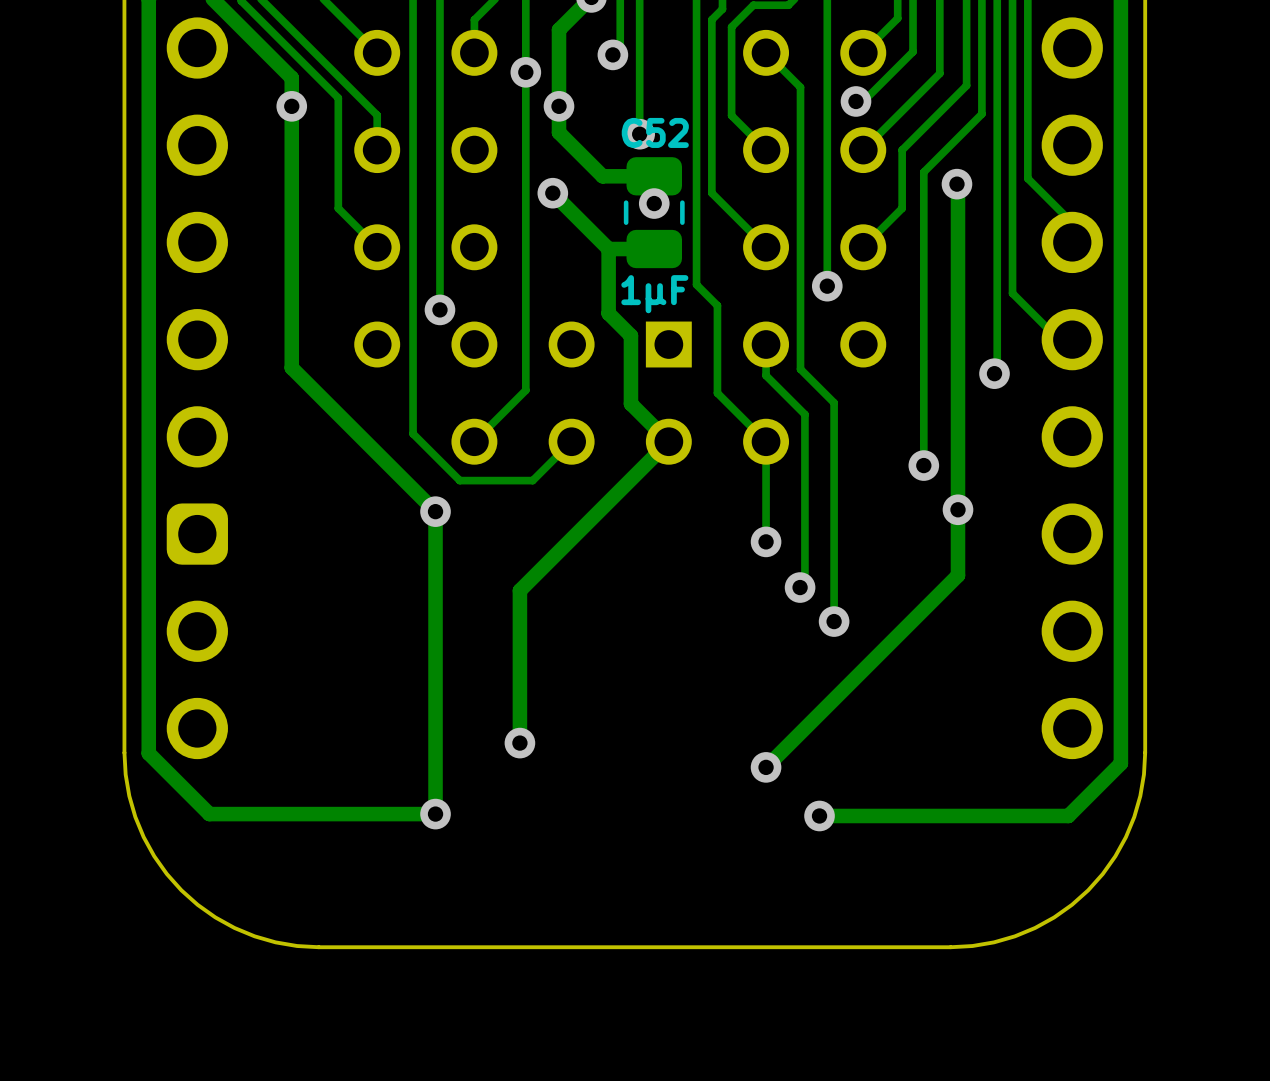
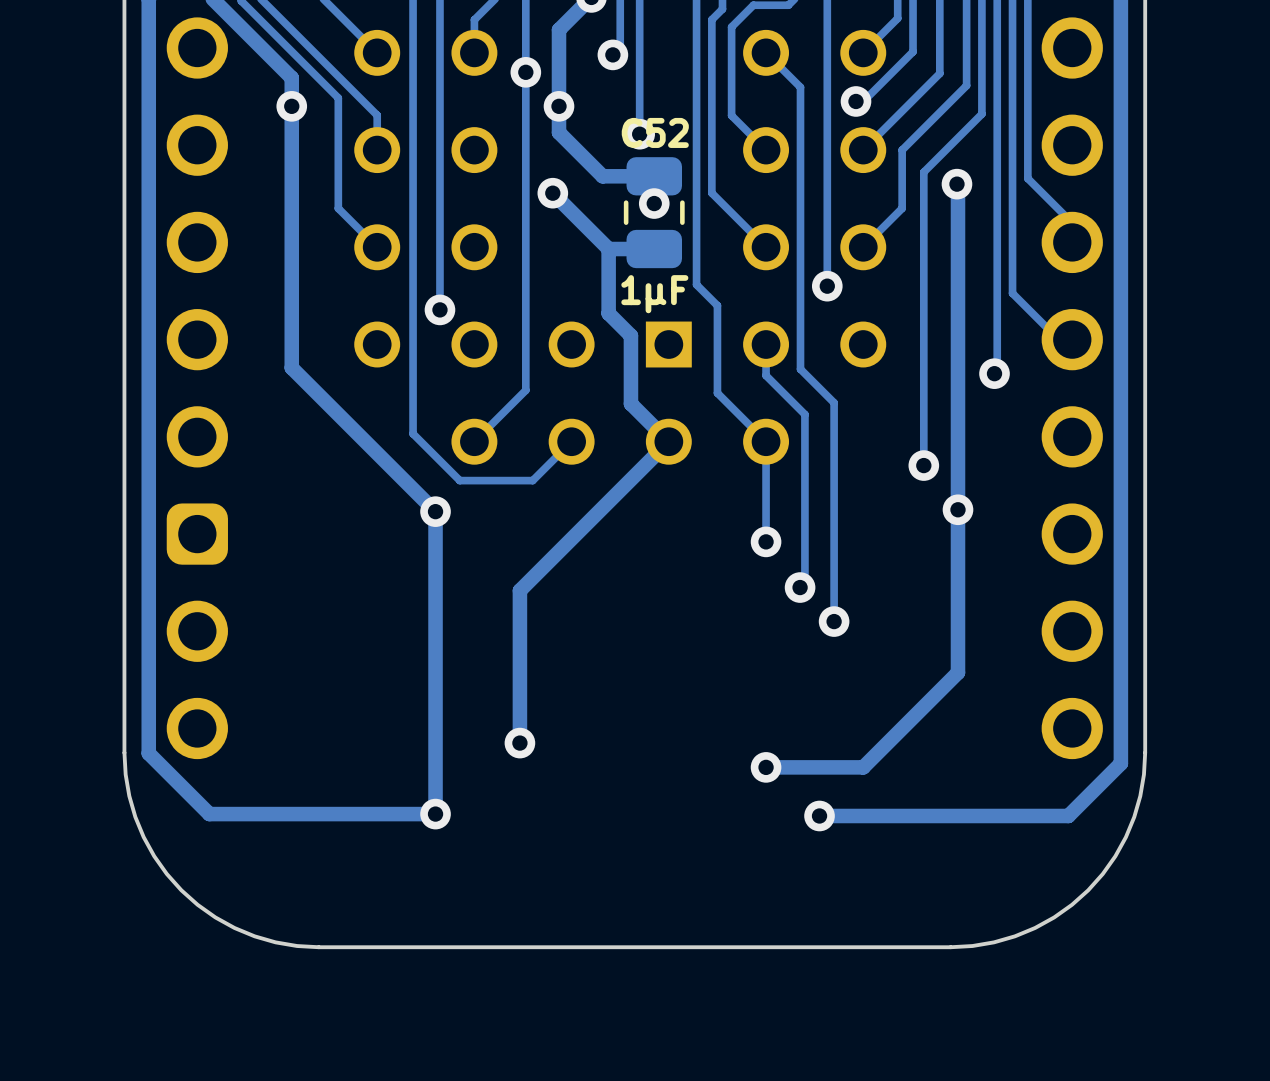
track: (957, 575) (766, 767) -> (957, 575) (957, 672) (863, 767) (766, 767)

